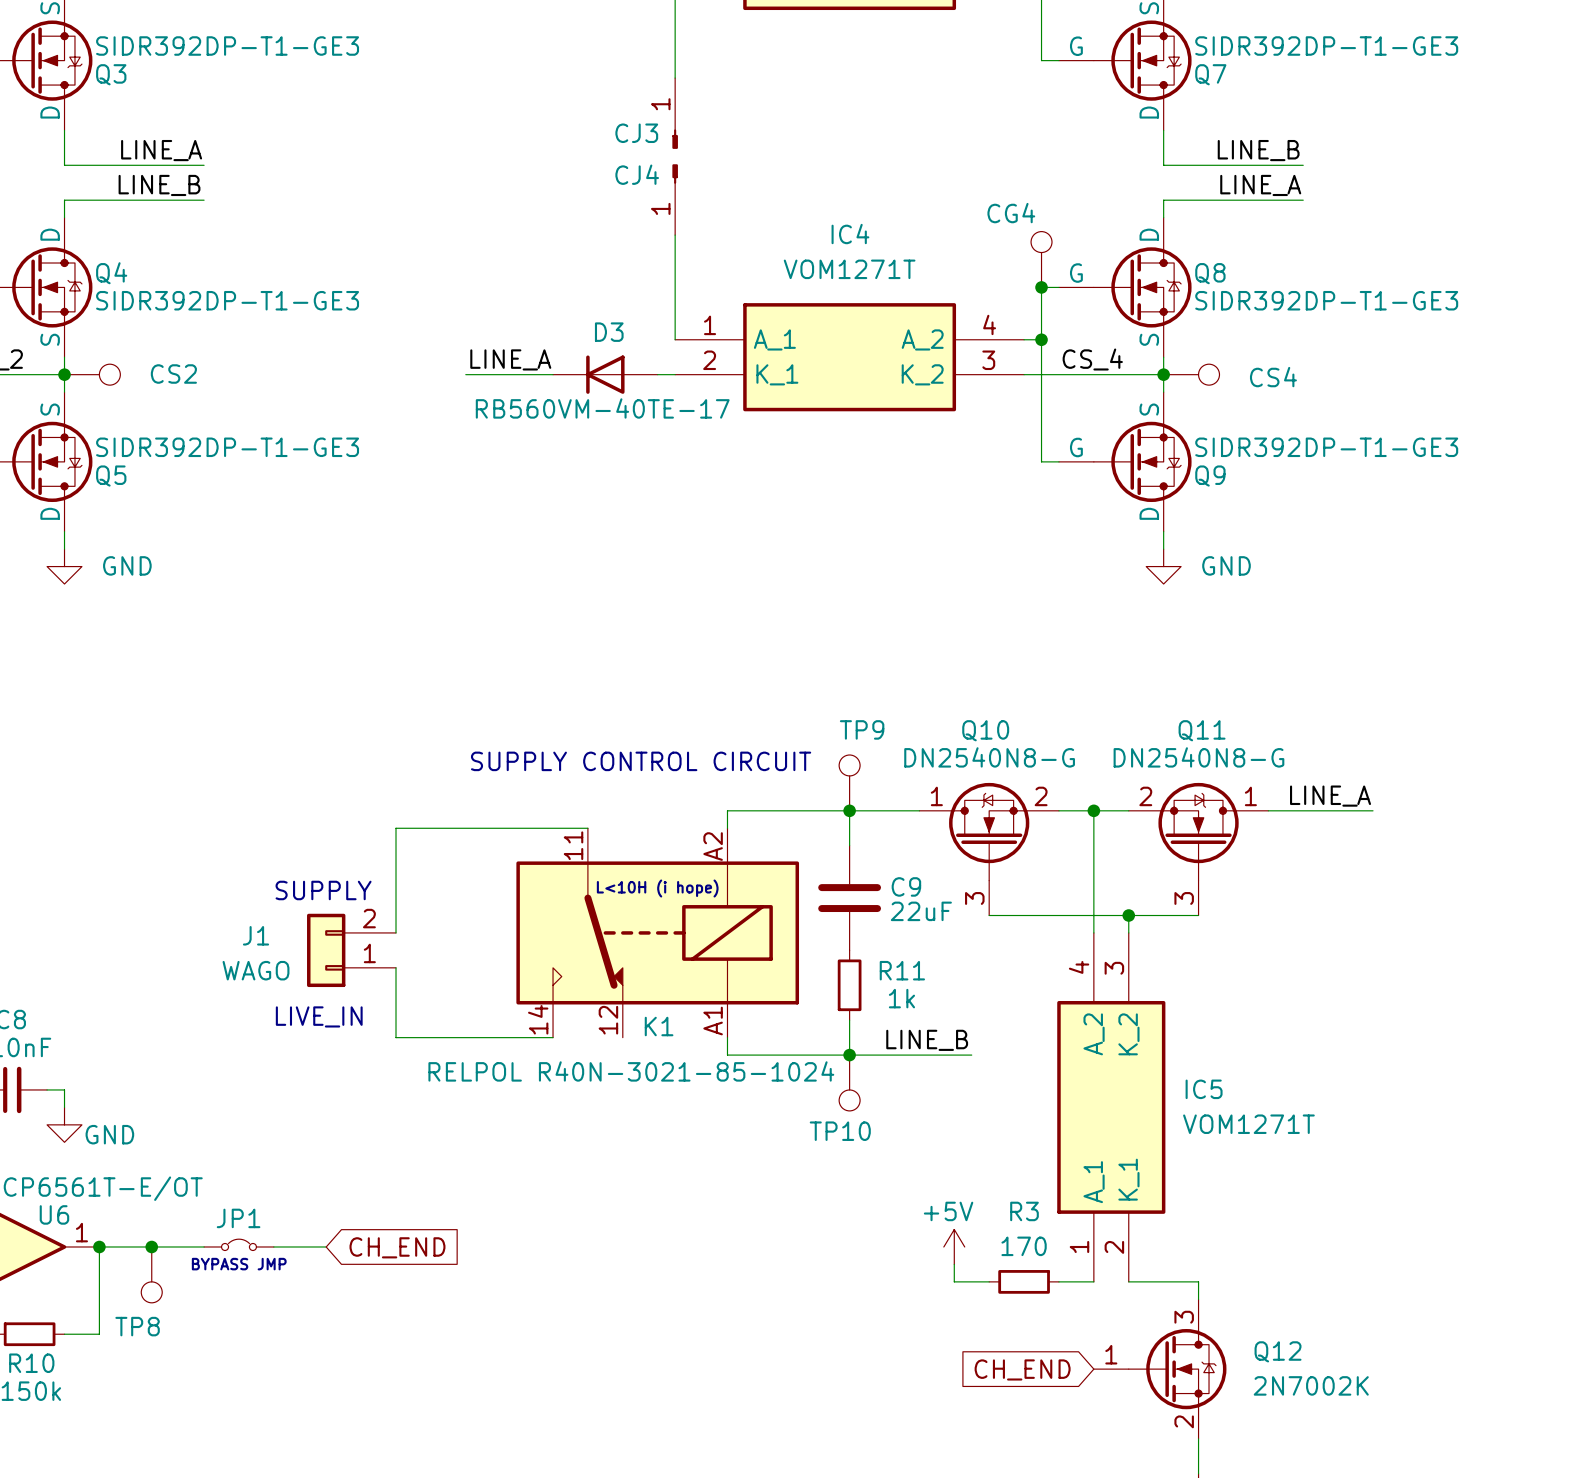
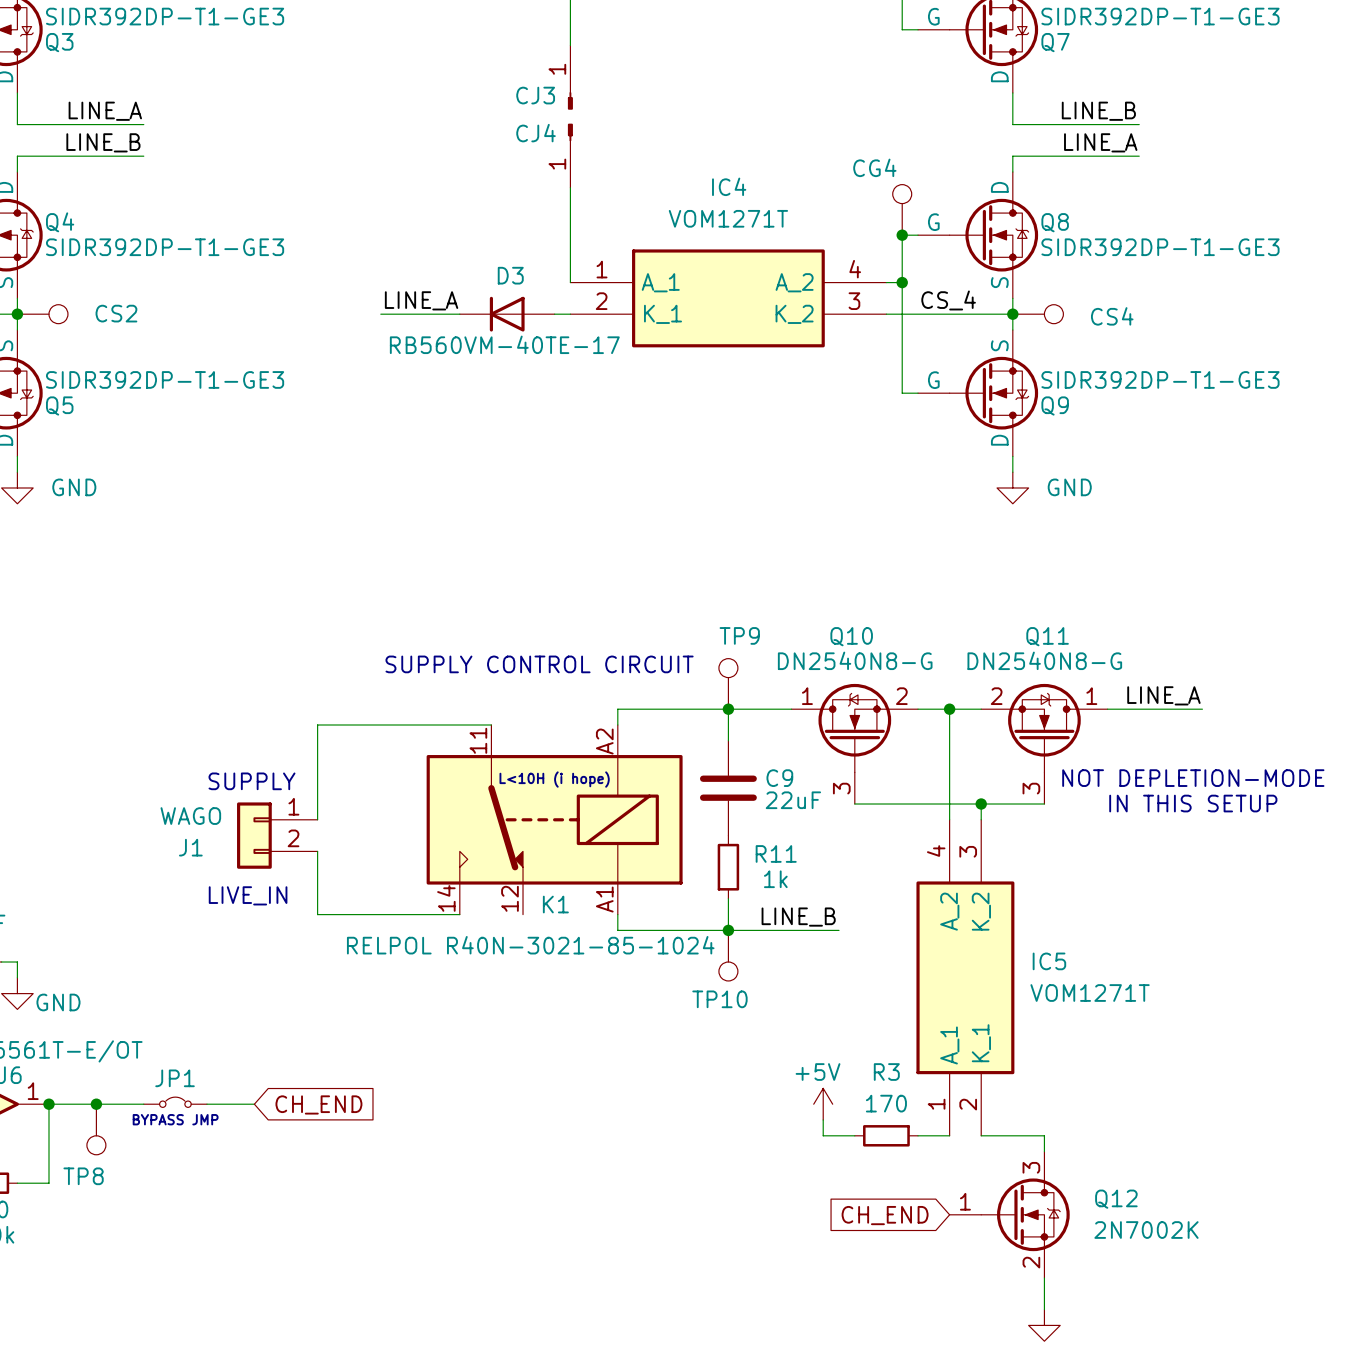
text: none -> NOT DEPLETION-MODE (1193, 778)
text: none -> IN THIS SETUP (1193, 803)
J1 flip: as is (326, 950) -> up-down (254, 835)

